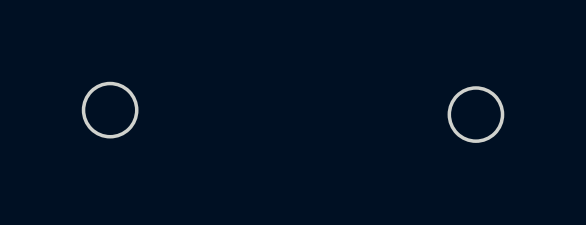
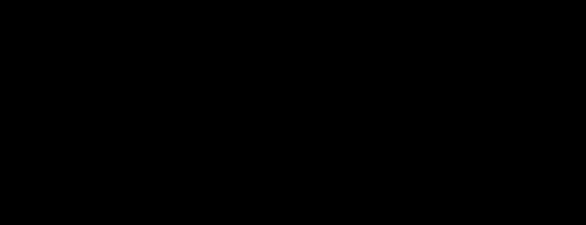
round board edge: [81, 81, 139, 139] -> none
round board edge: [447, 86, 505, 143] -> none

